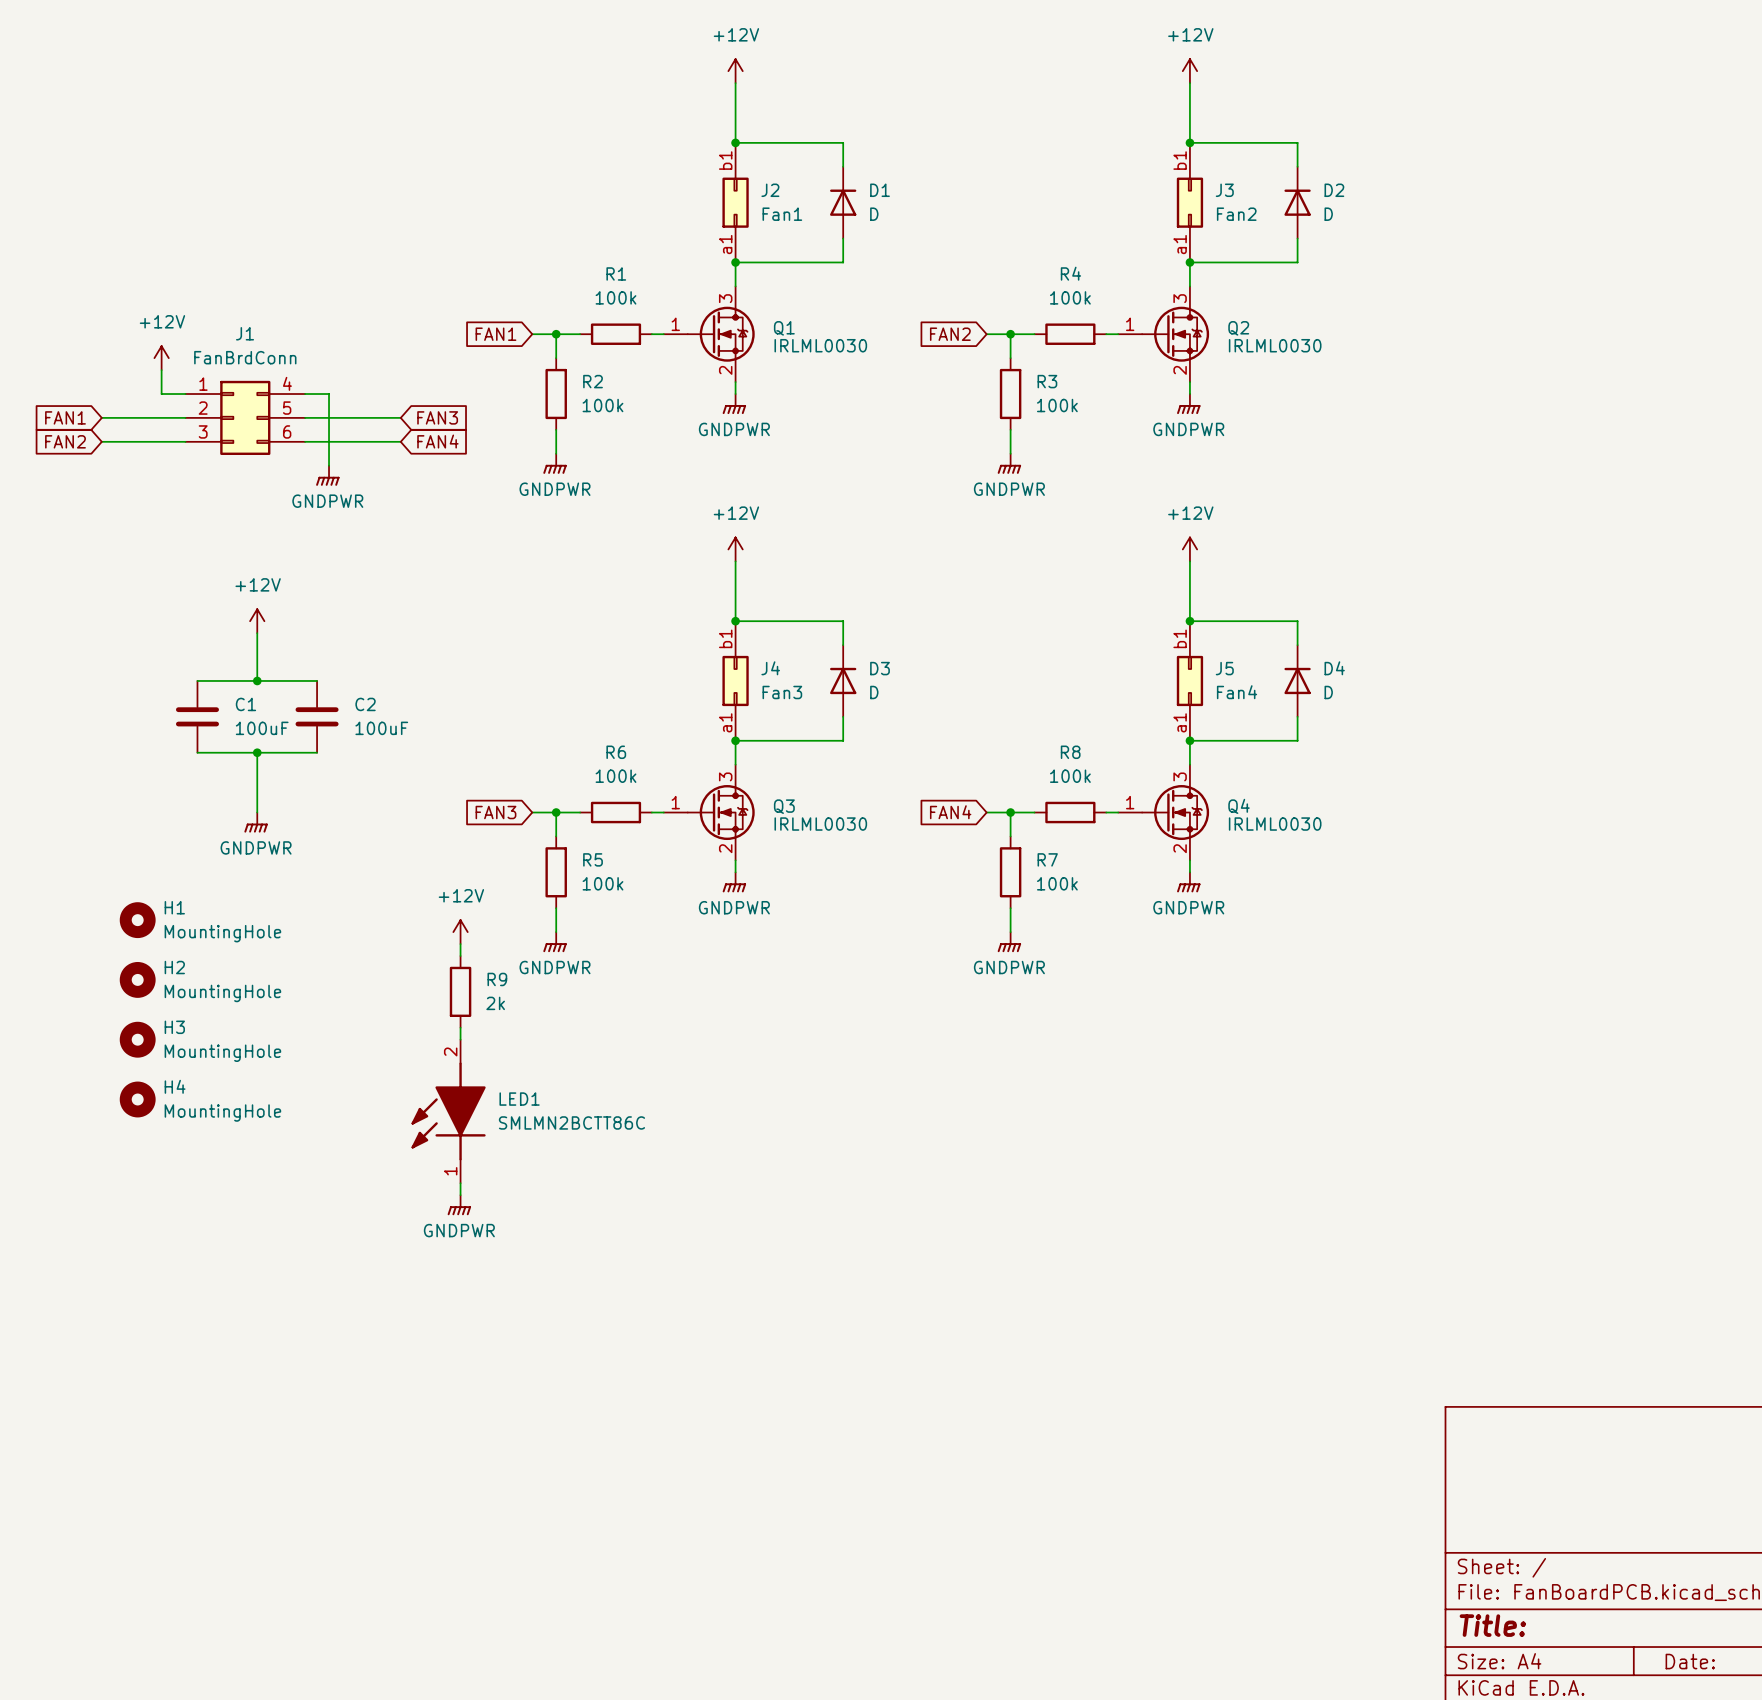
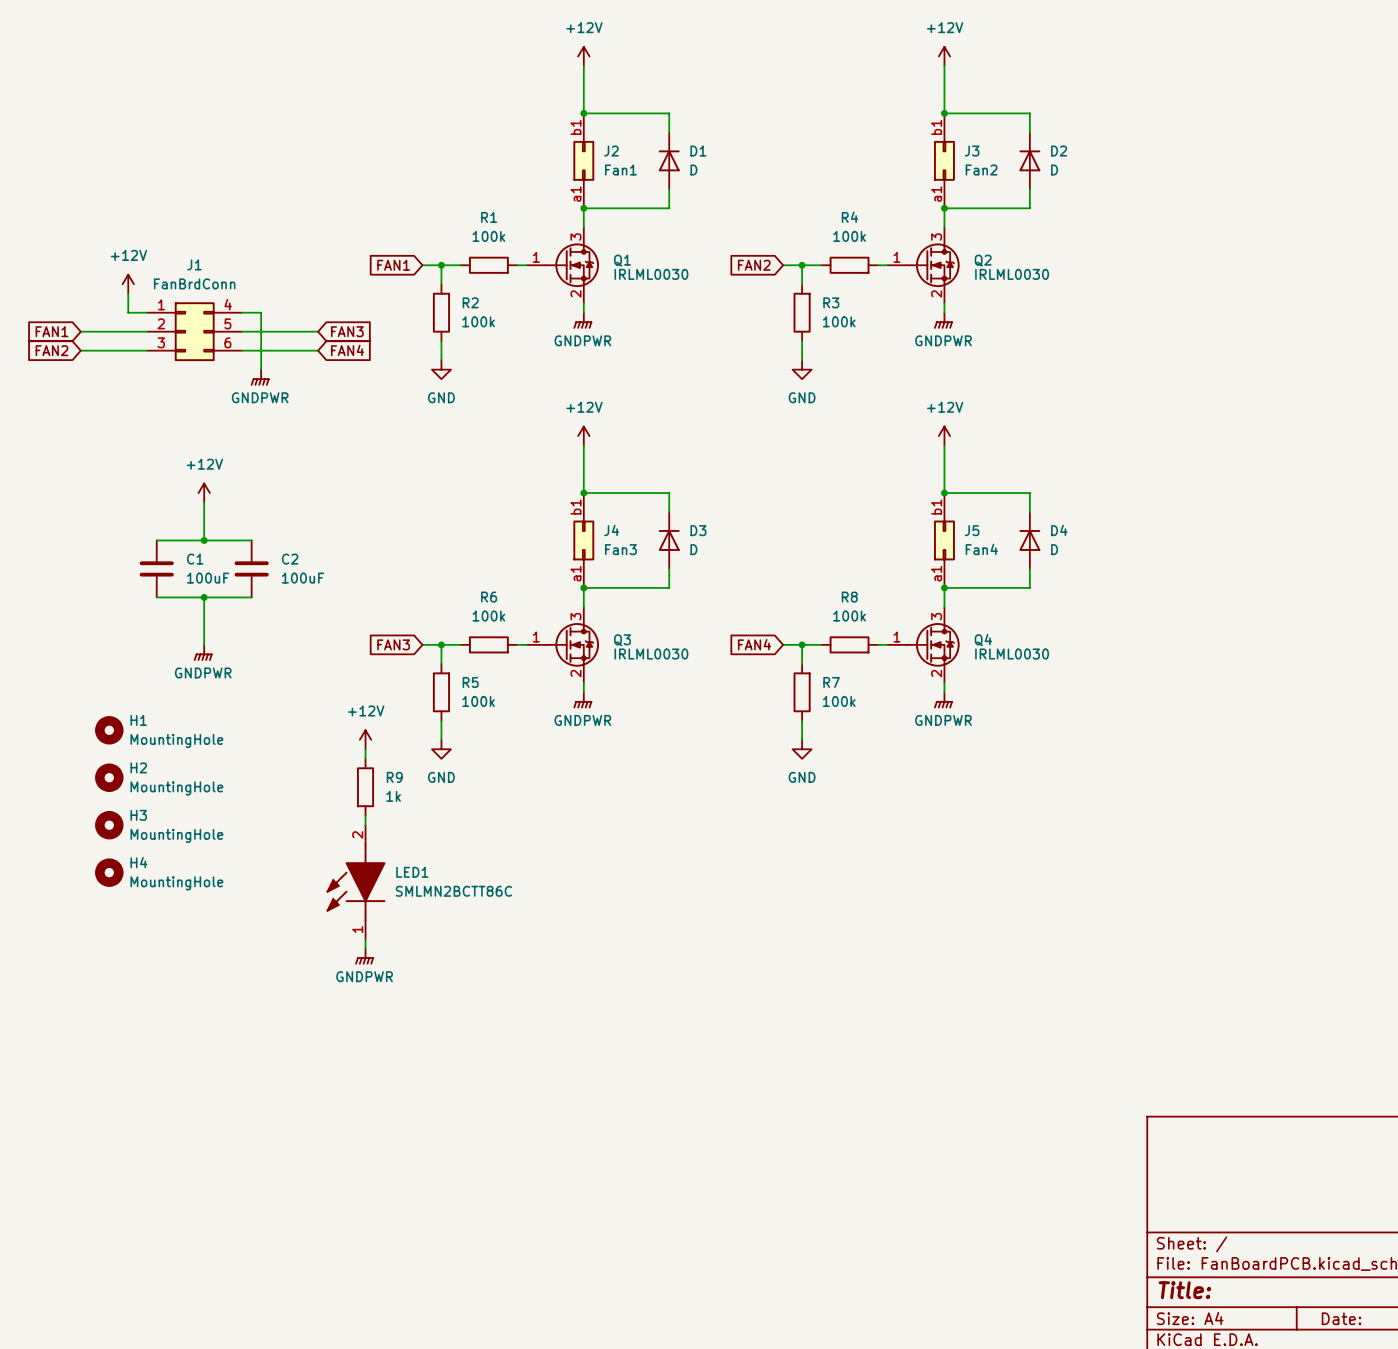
power symbol: GNDPWR (555, 463) -> GND (441, 369)
power symbol: GNDPWR (1009, 463) -> GND (802, 369)
power symbol: GNDPWR (555, 942) -> GND (441, 749)
power symbol: GNDPWR (1009, 942) -> GND (802, 749)
R9 value: 2k (495, 1003) -> 1k (393, 796)

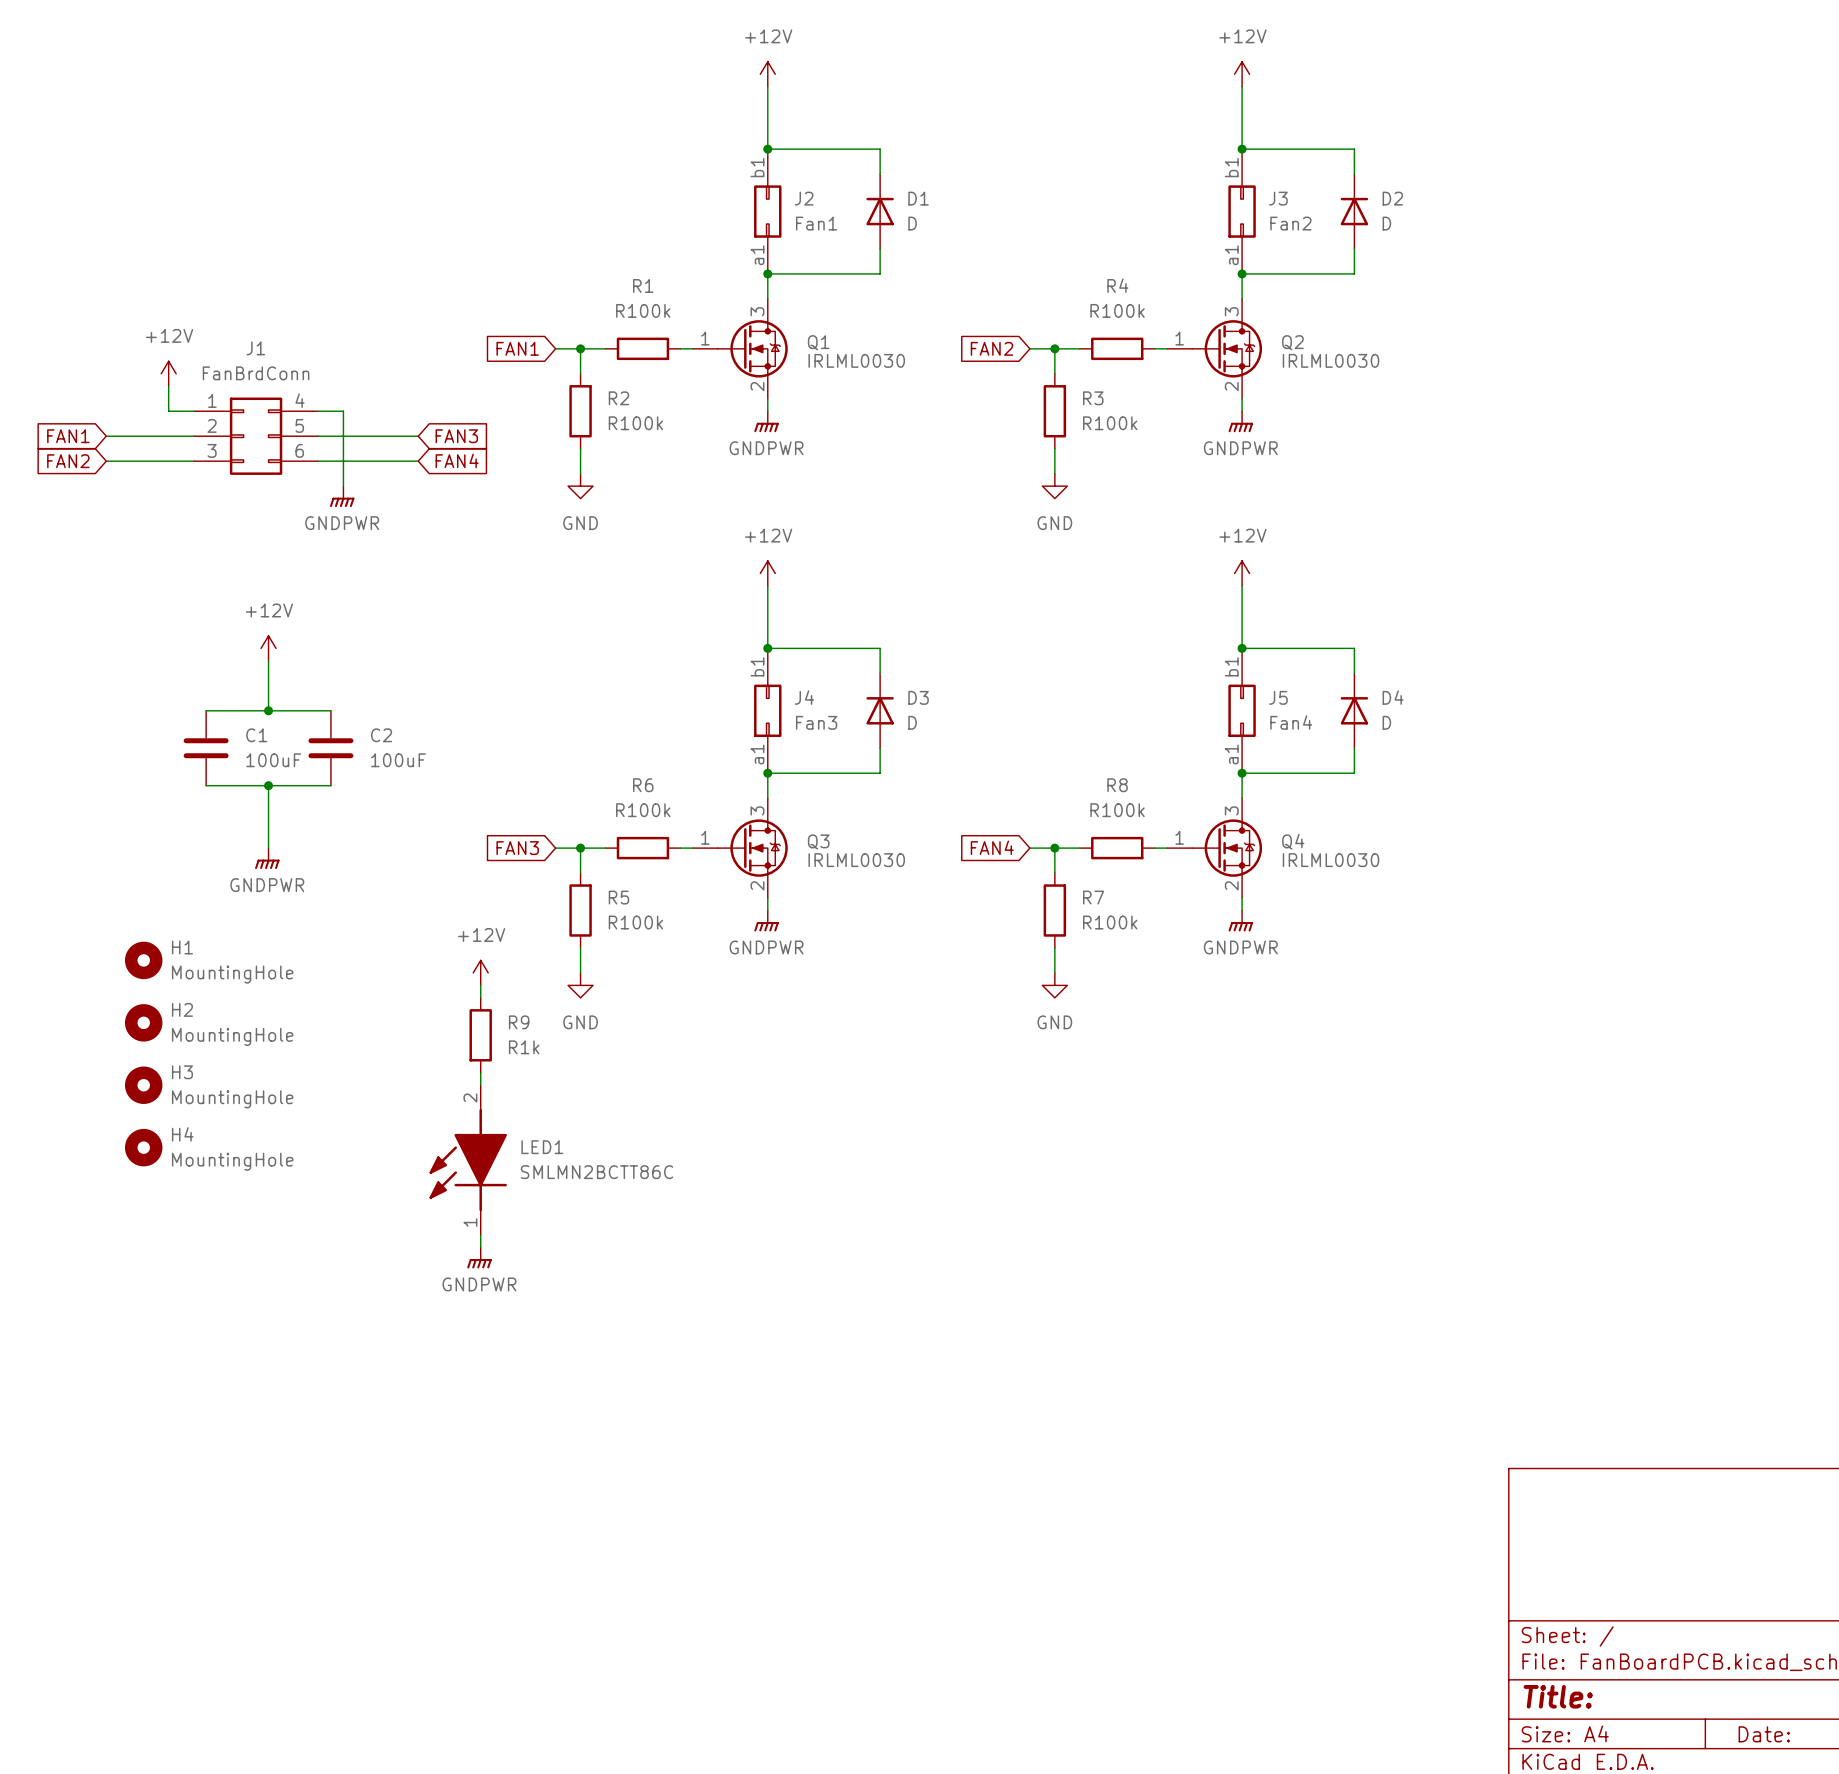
R1 value: 100k (488, 236) -> R100k (643, 310)
R4 value: 100k (849, 236) -> R100k (1117, 310)
R2 value: 100k (478, 321) -> R100k (635, 423)
R3 value: 100k (839, 321) -> R100k (1110, 423)
R6 value: 100k (488, 616) -> R100k (643, 810)
R8 value: 100k (849, 616) -> R100k (1117, 810)
R5 value: 100k (478, 701) -> R100k (635, 922)
R7 value: 100k (839, 701) -> R100k (1110, 922)
R9 value: 1k (393, 796) -> R1k (524, 1047)

